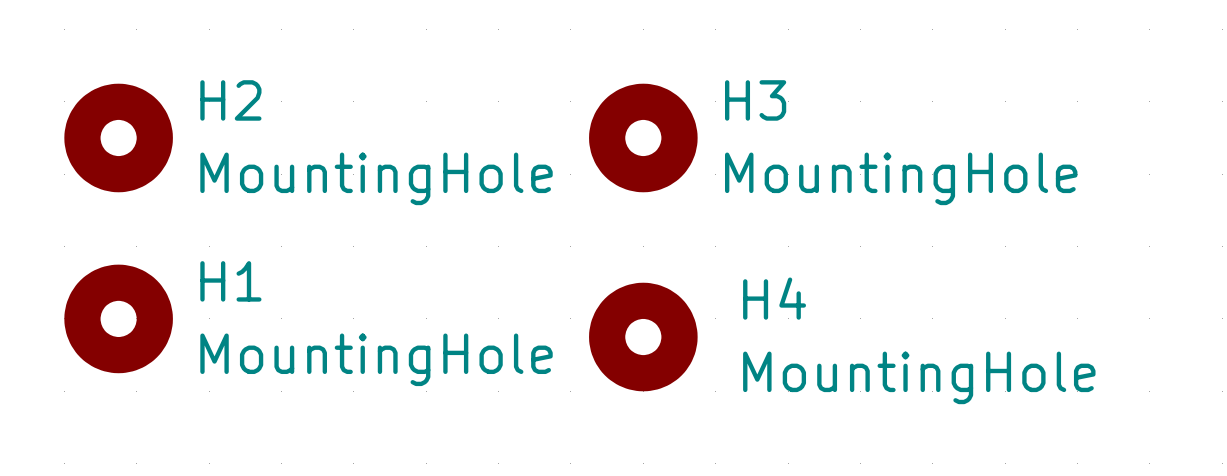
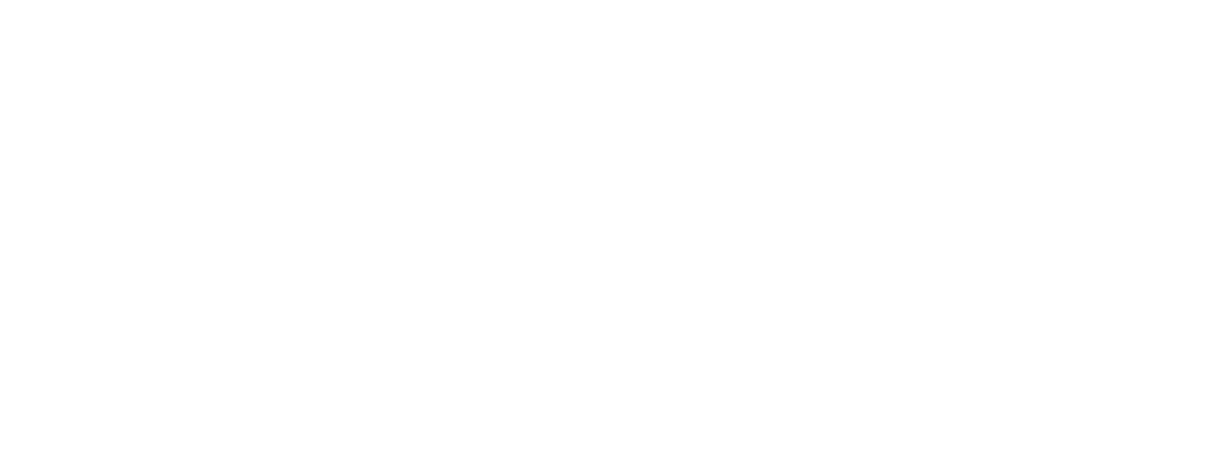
H2: MountingHole (118, 137) -> none
H3: MountingHole (643, 137) -> none
H1: MountingHole (118, 318) -> none
H4: MountingHole (643, 337) -> none

